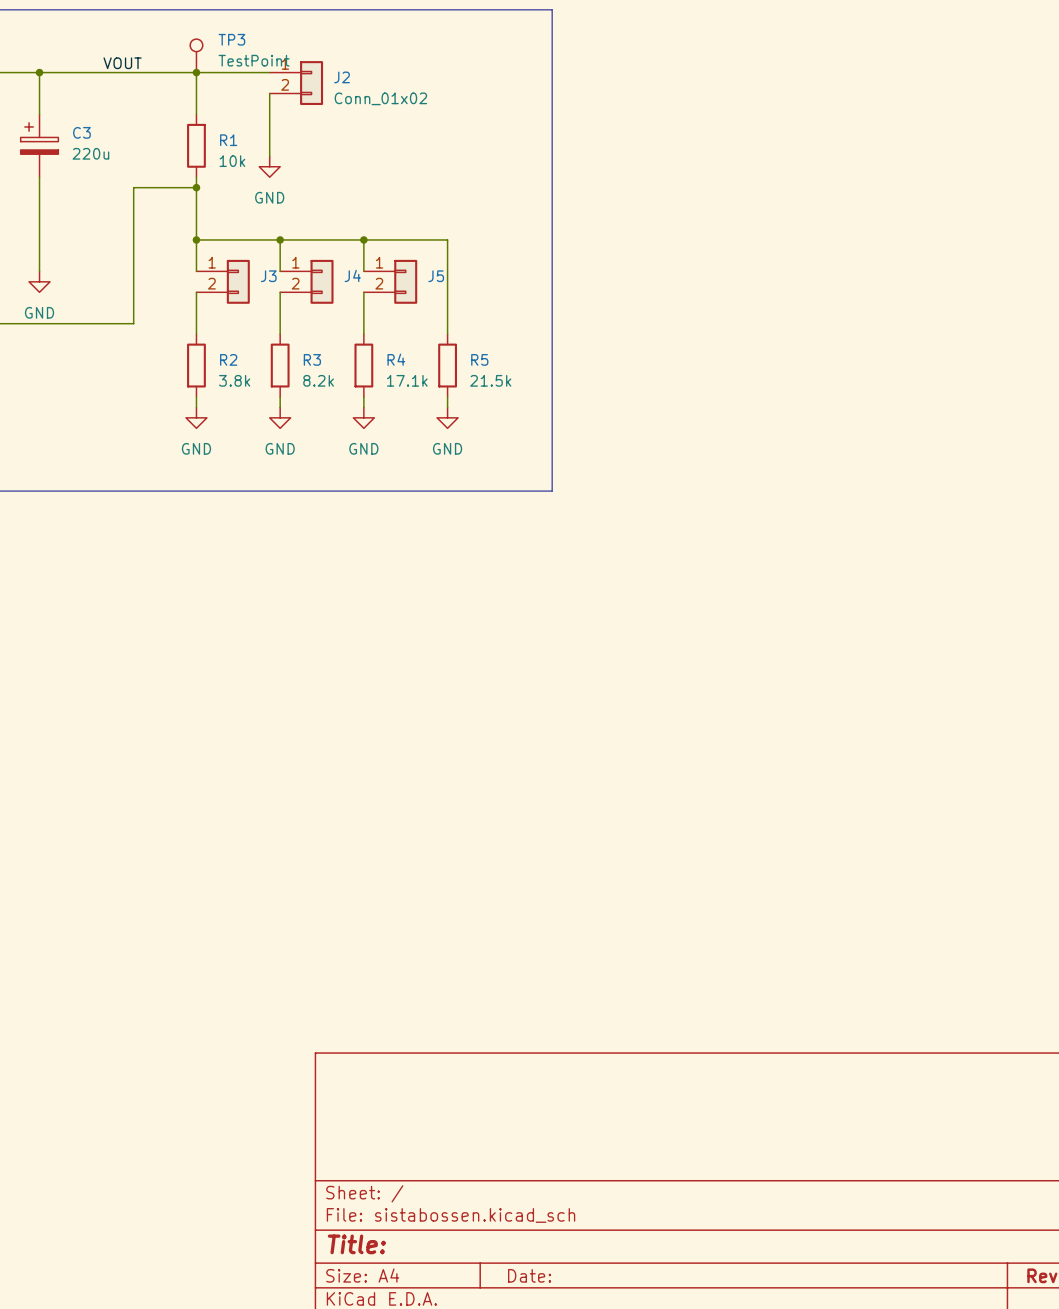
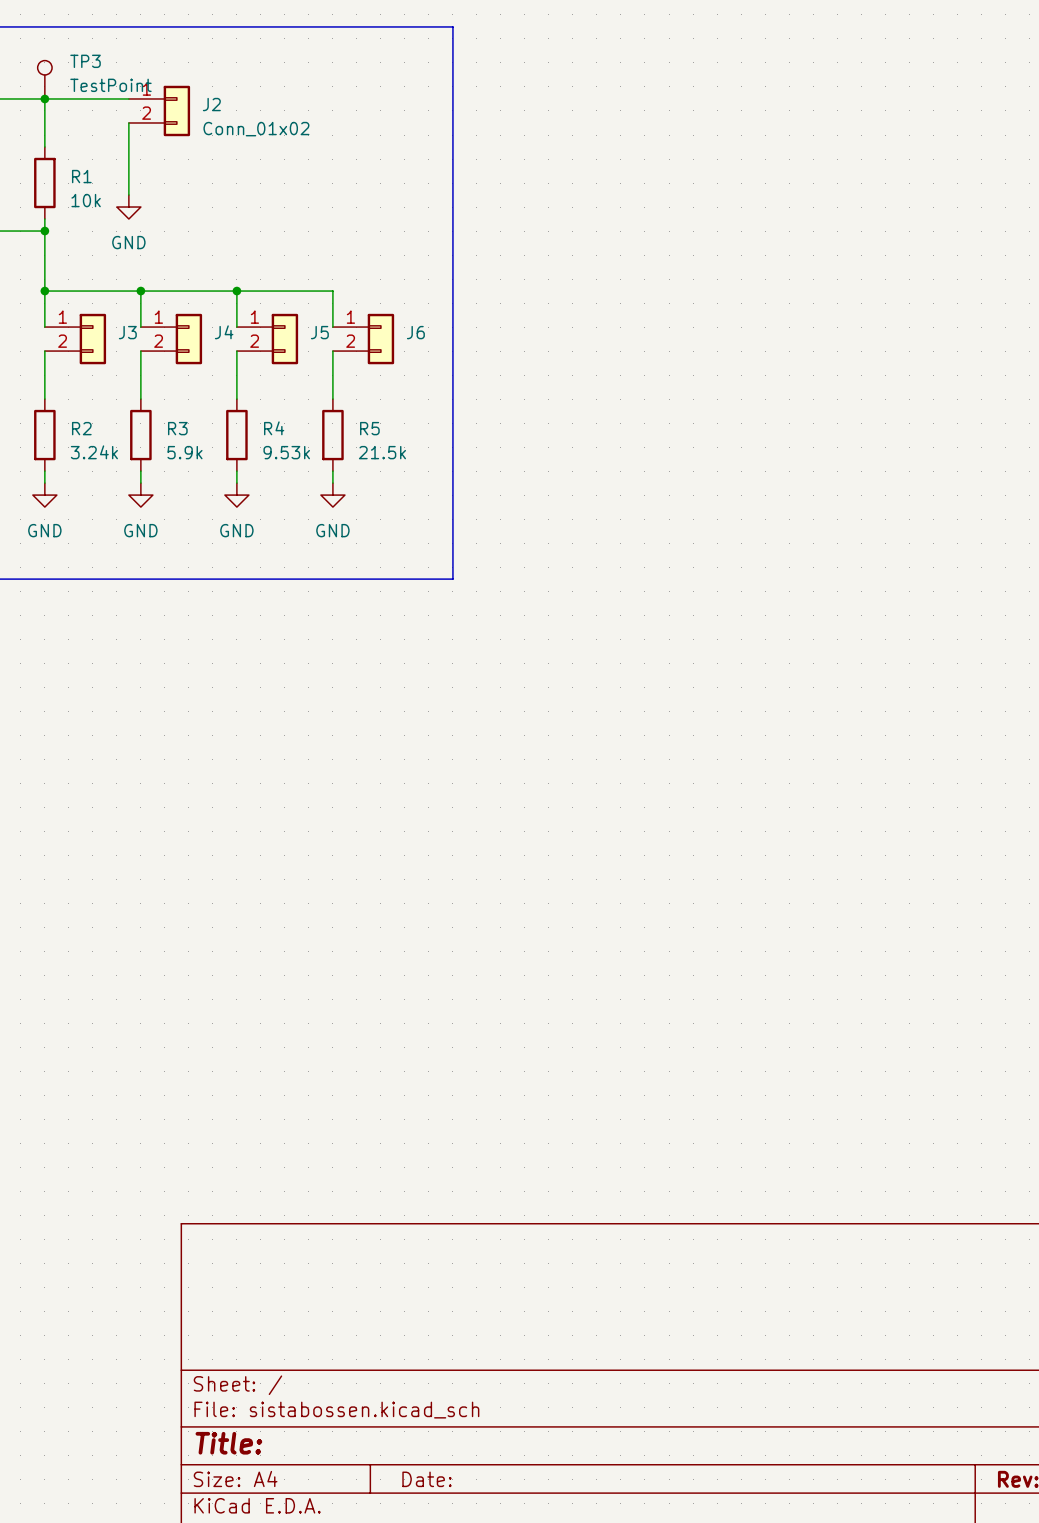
wire: (447, 271) (447, 292) -> none
J6: none -> (363, 339)
R2 value: 3.8k (234, 380) -> 3.24k (94, 452)
R3 value: 8.2k (318, 380) -> 5.9k (184, 452)
R4 value: 17.1k (407, 380) -> 9.53k (286, 452)

